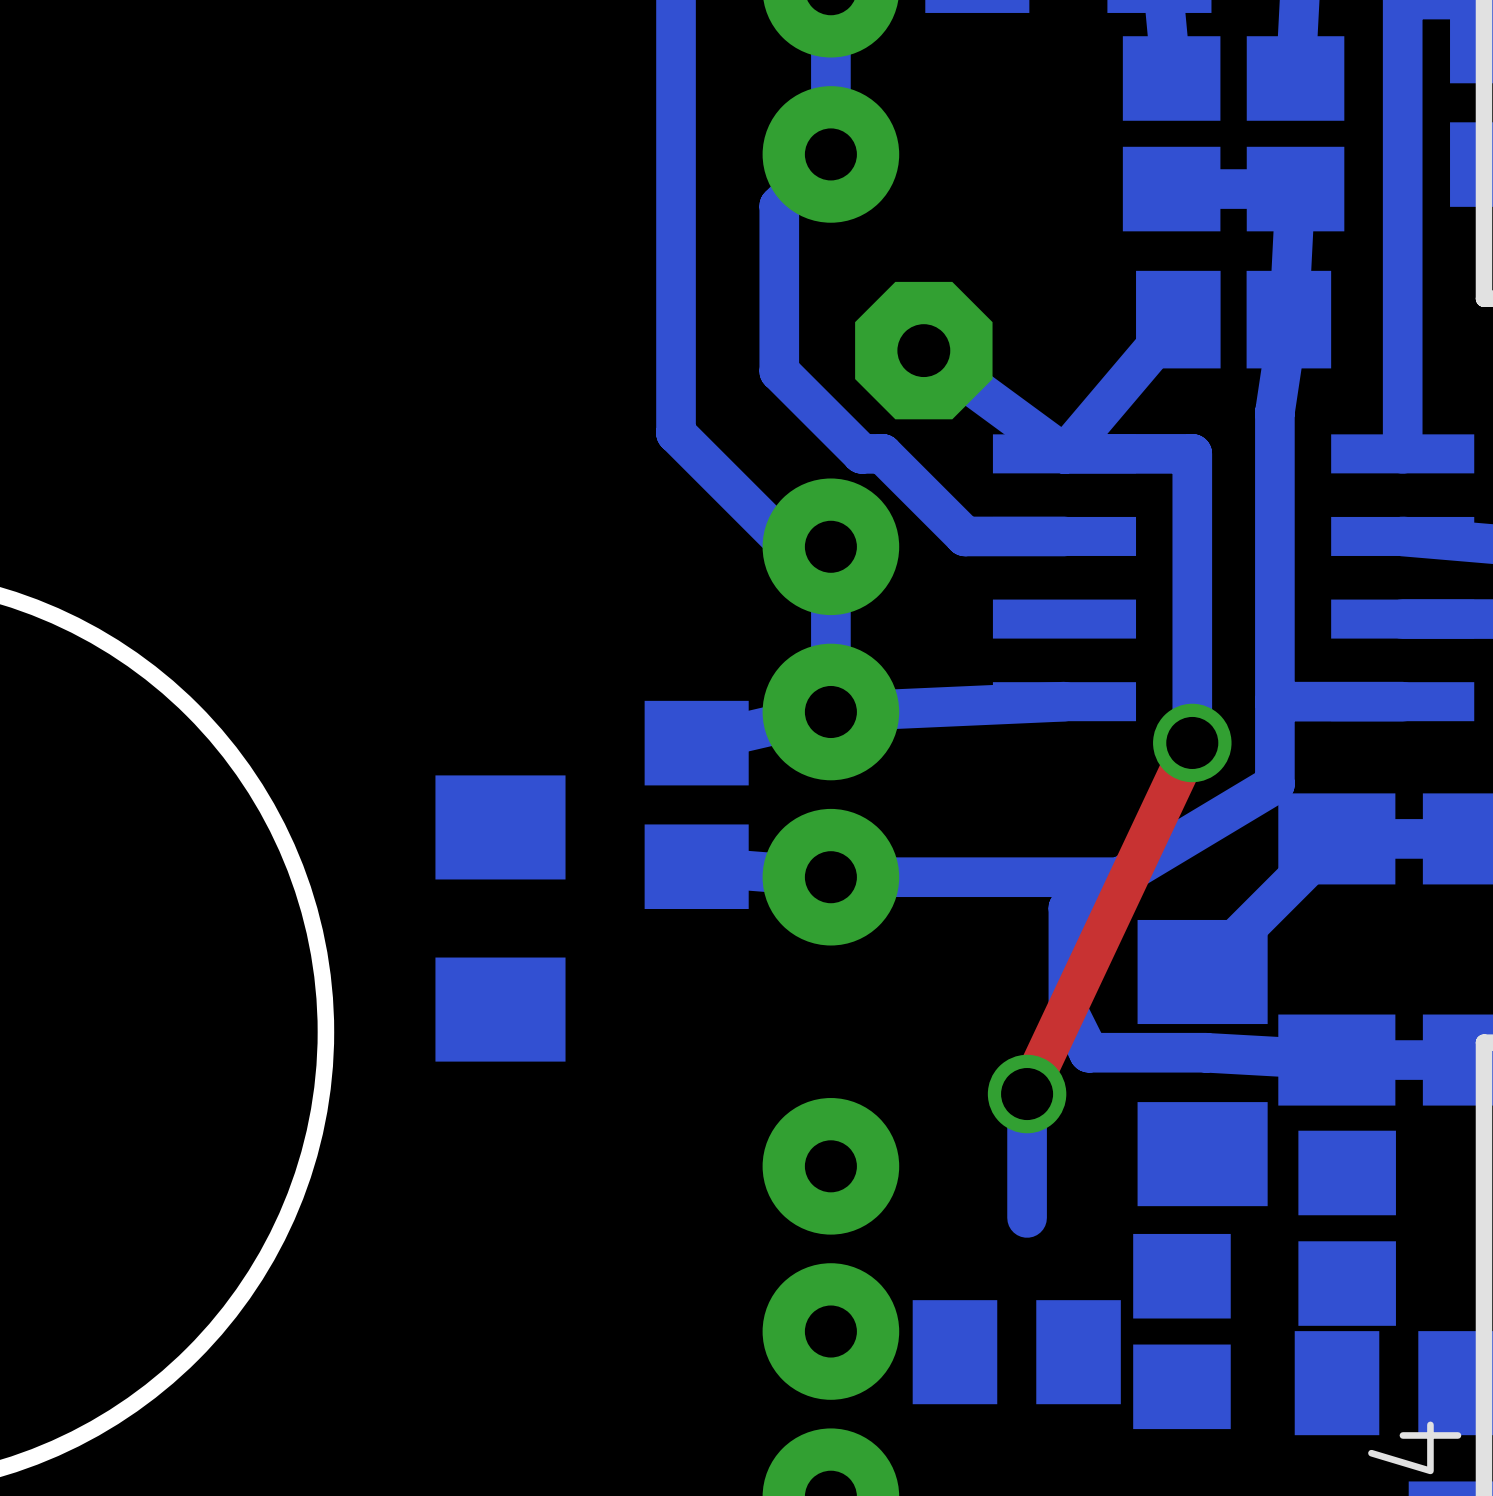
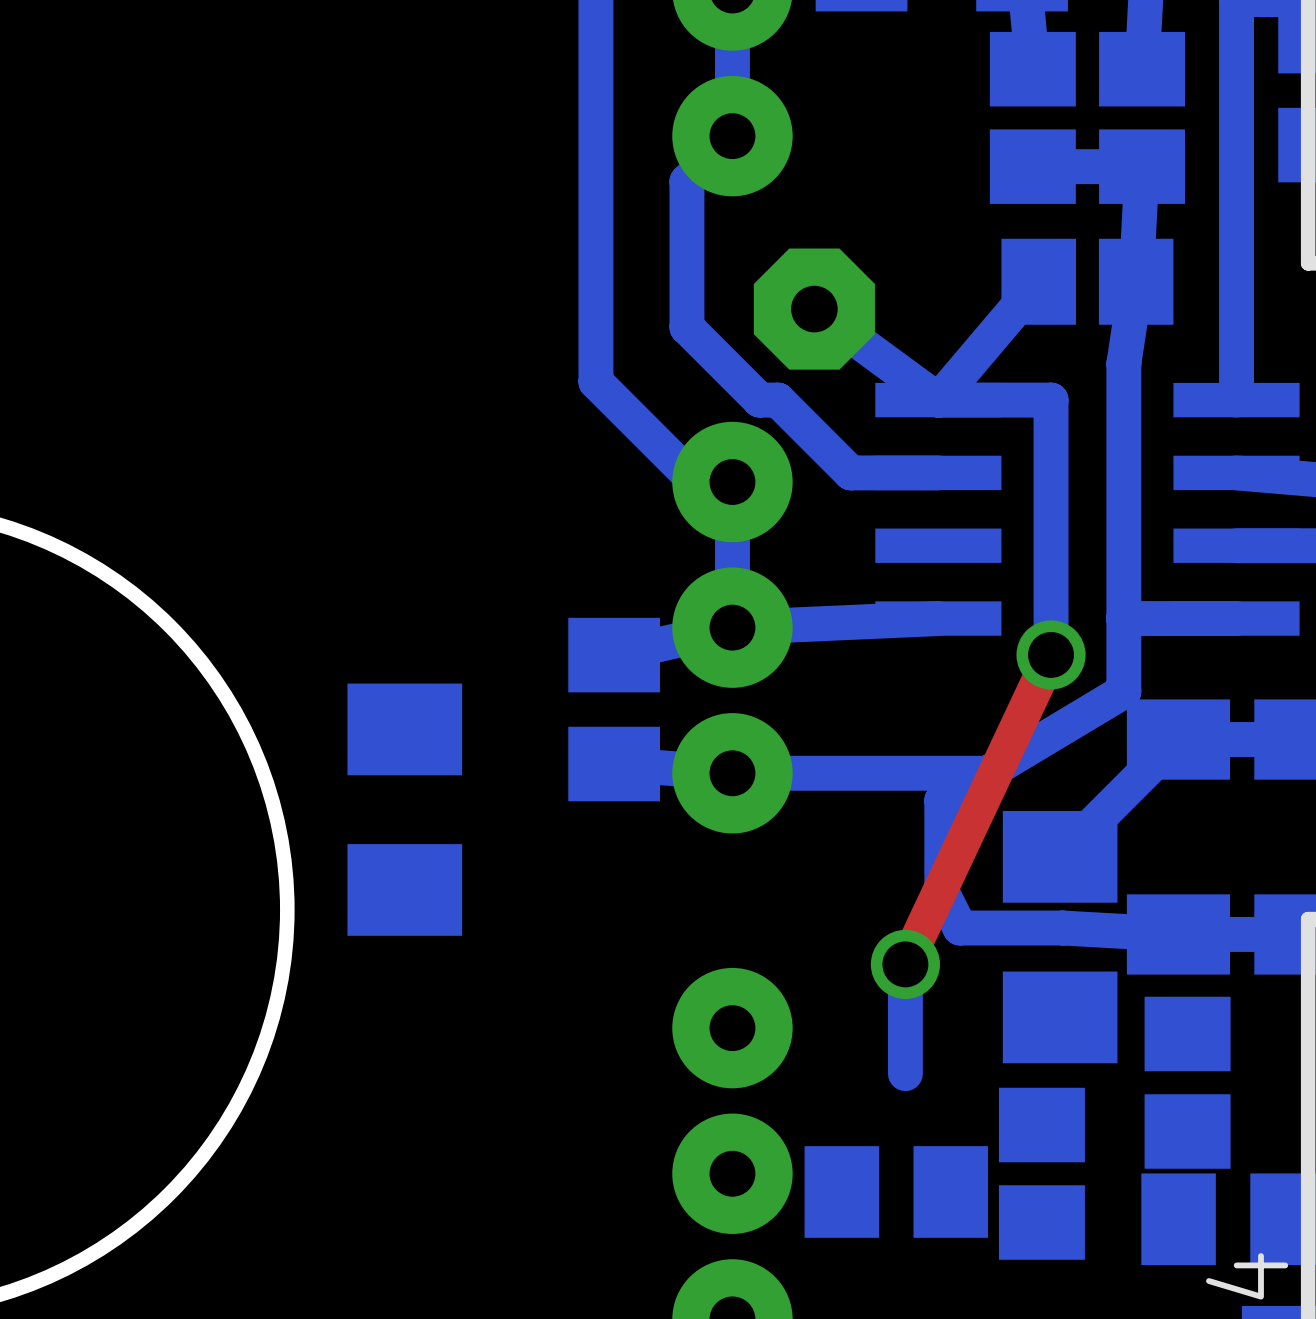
part position: (500, 918) -> (404, 809)

